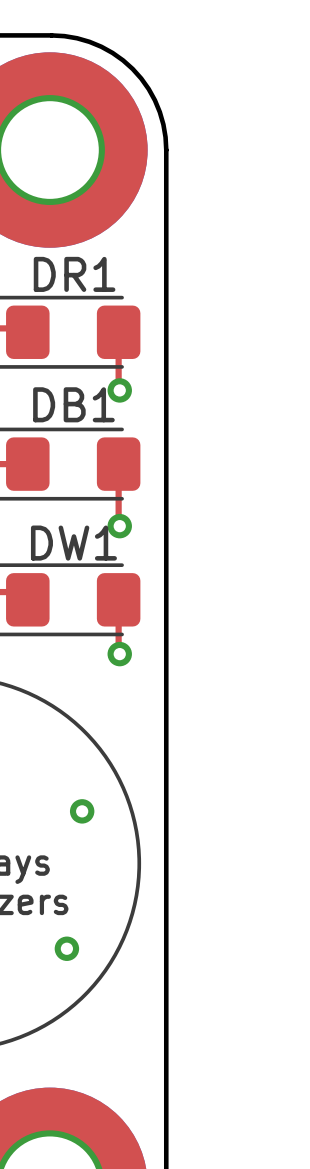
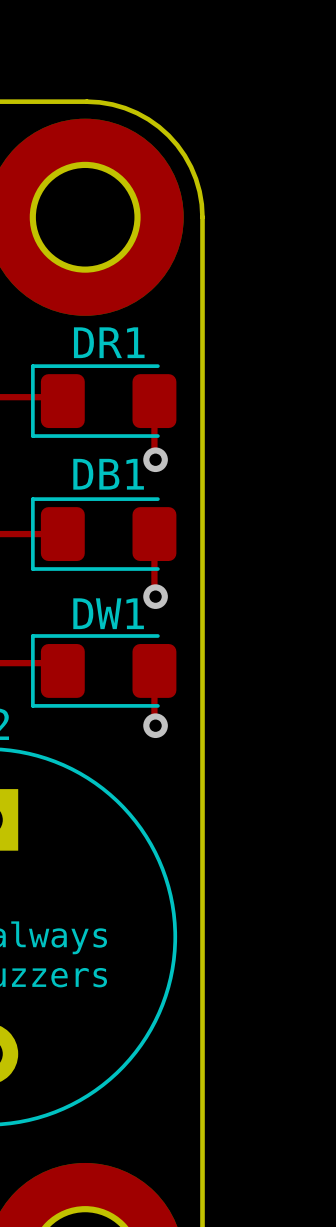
via: (82, 811) -> none
via: (66, 948) -> none

